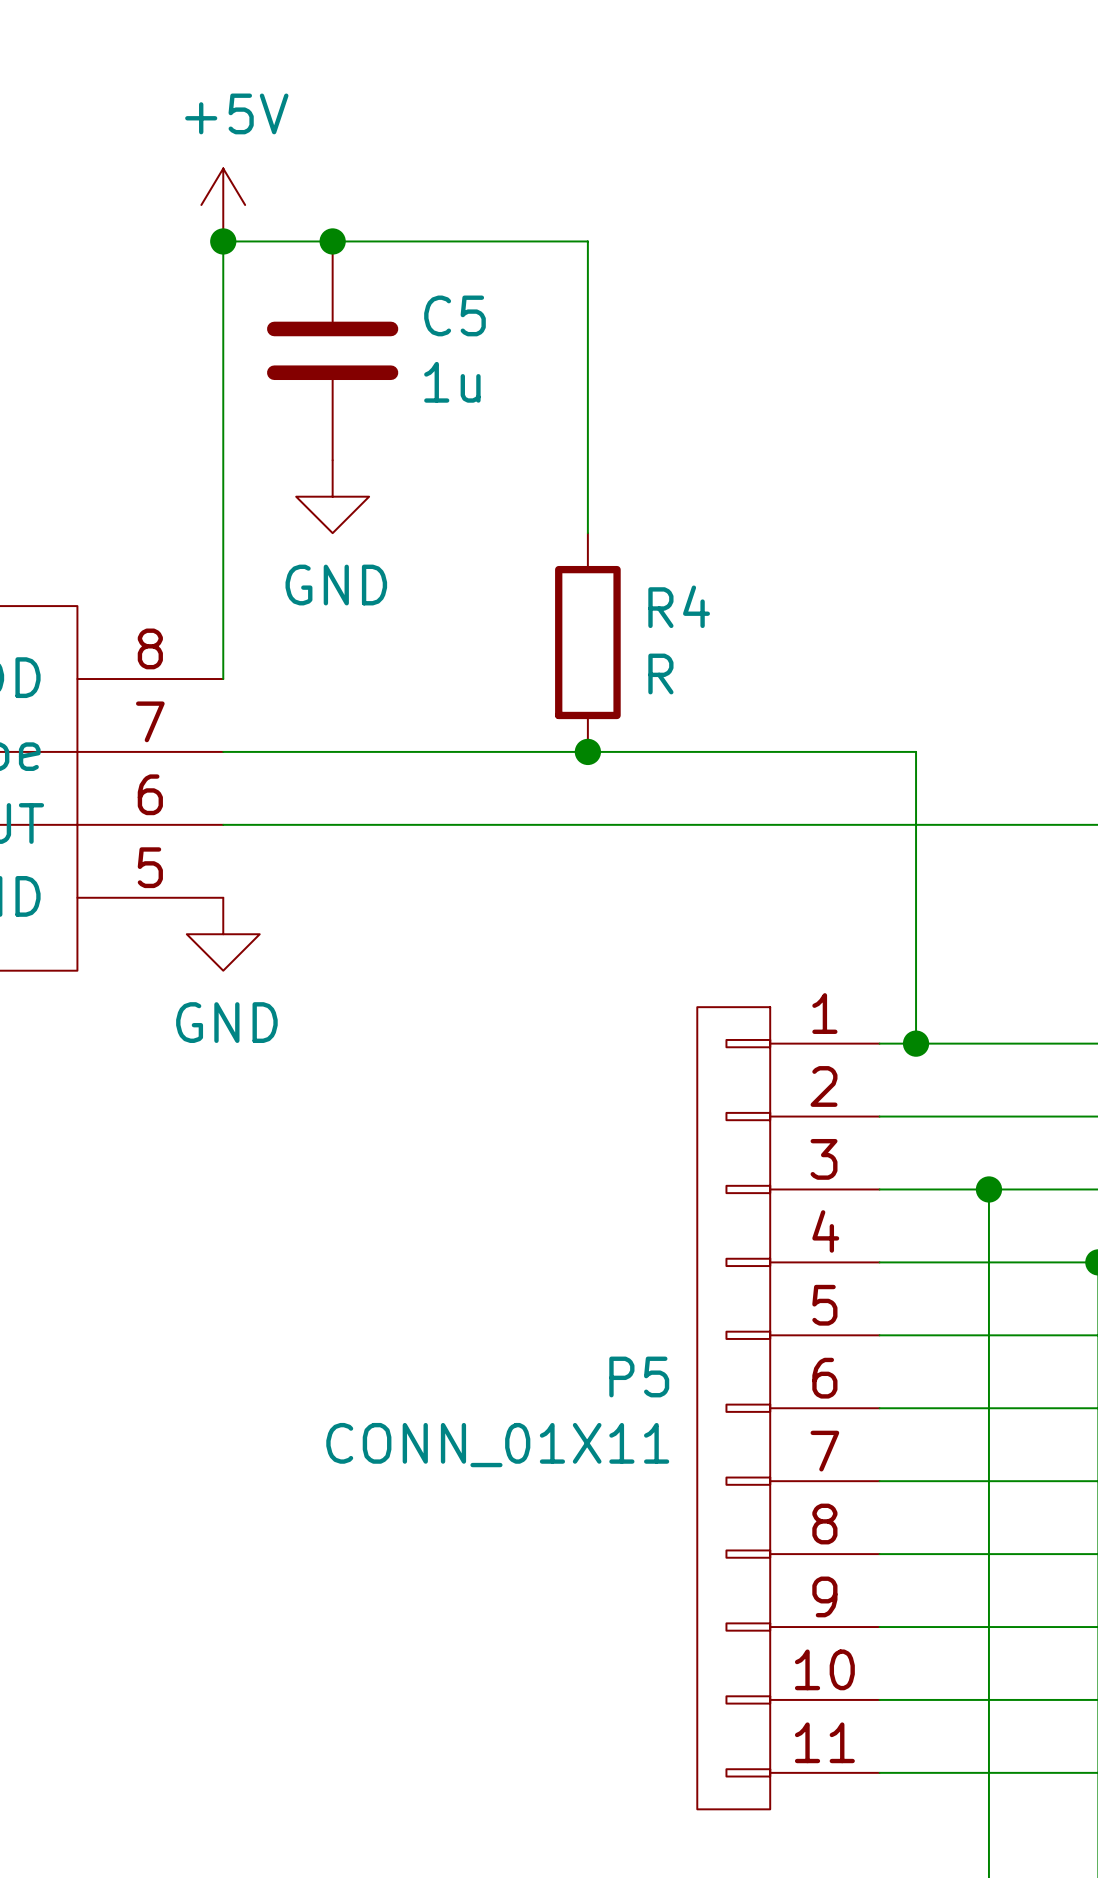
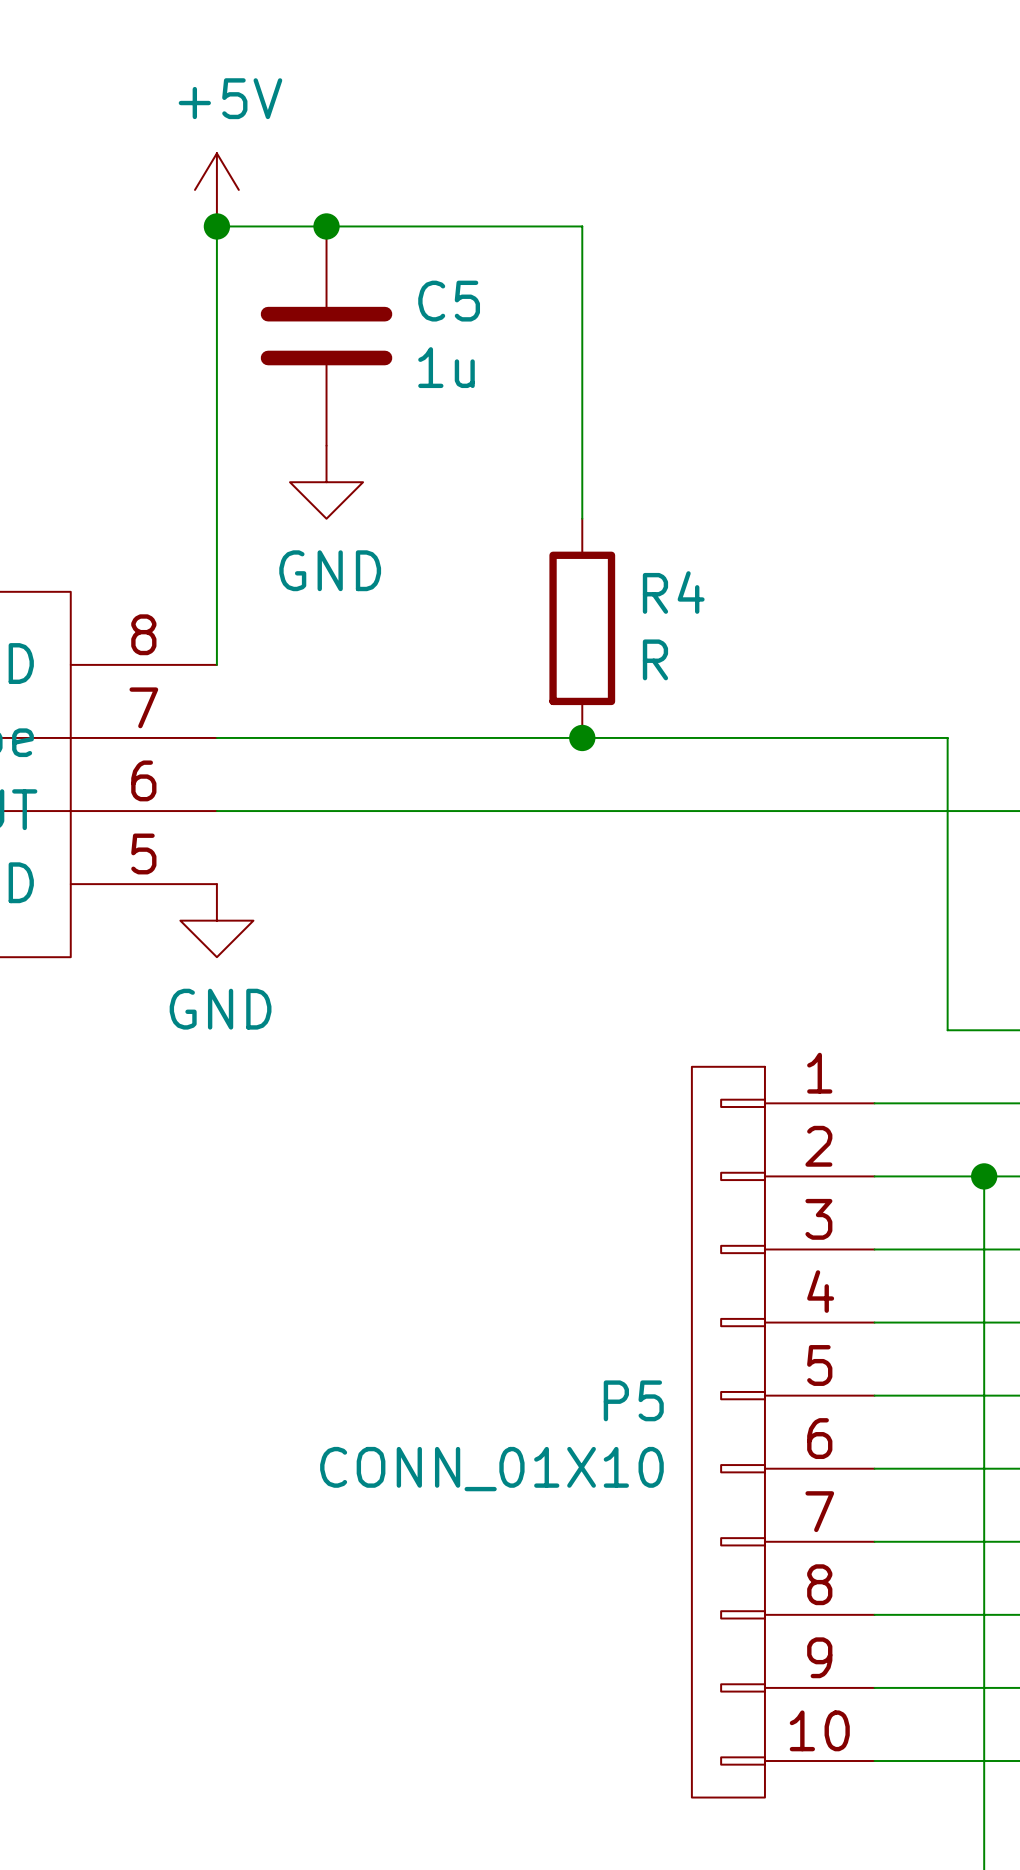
wire: (916, 751) (916, 1043) -> (911, 737) (947, 737) (947, 1030)
P5 symbol: [697, 1007, 880, 1810] -> [691, 1066, 875, 1798]
wire: (879, 1043) (952, 1043) -> none
junction: (916, 1043) -> none
P5 value: CONN_01X11 (497, 1445) -> CONN_01X10 (491, 1469)

